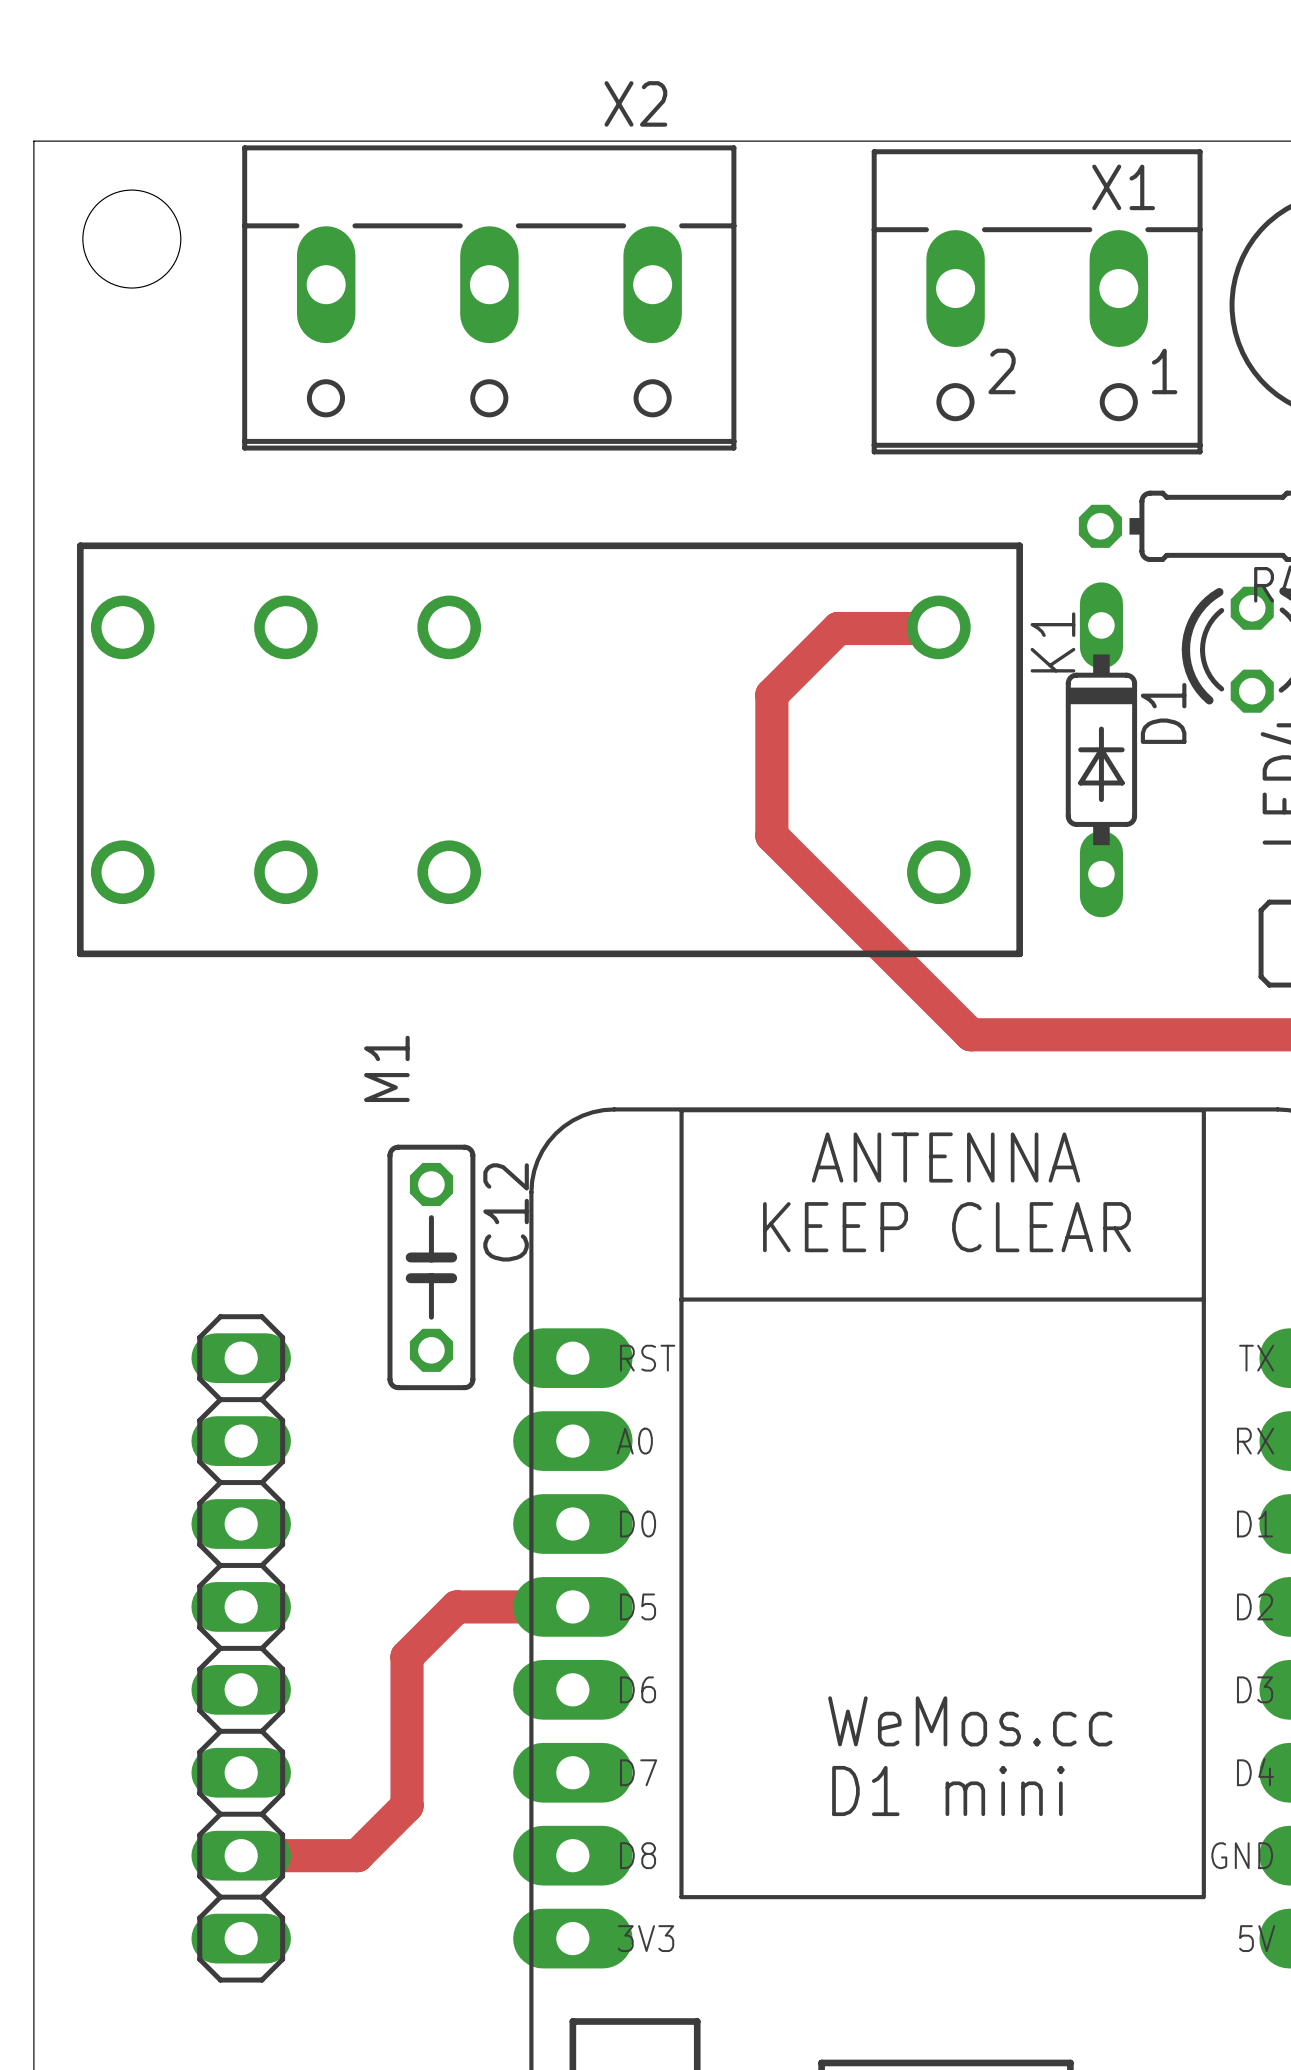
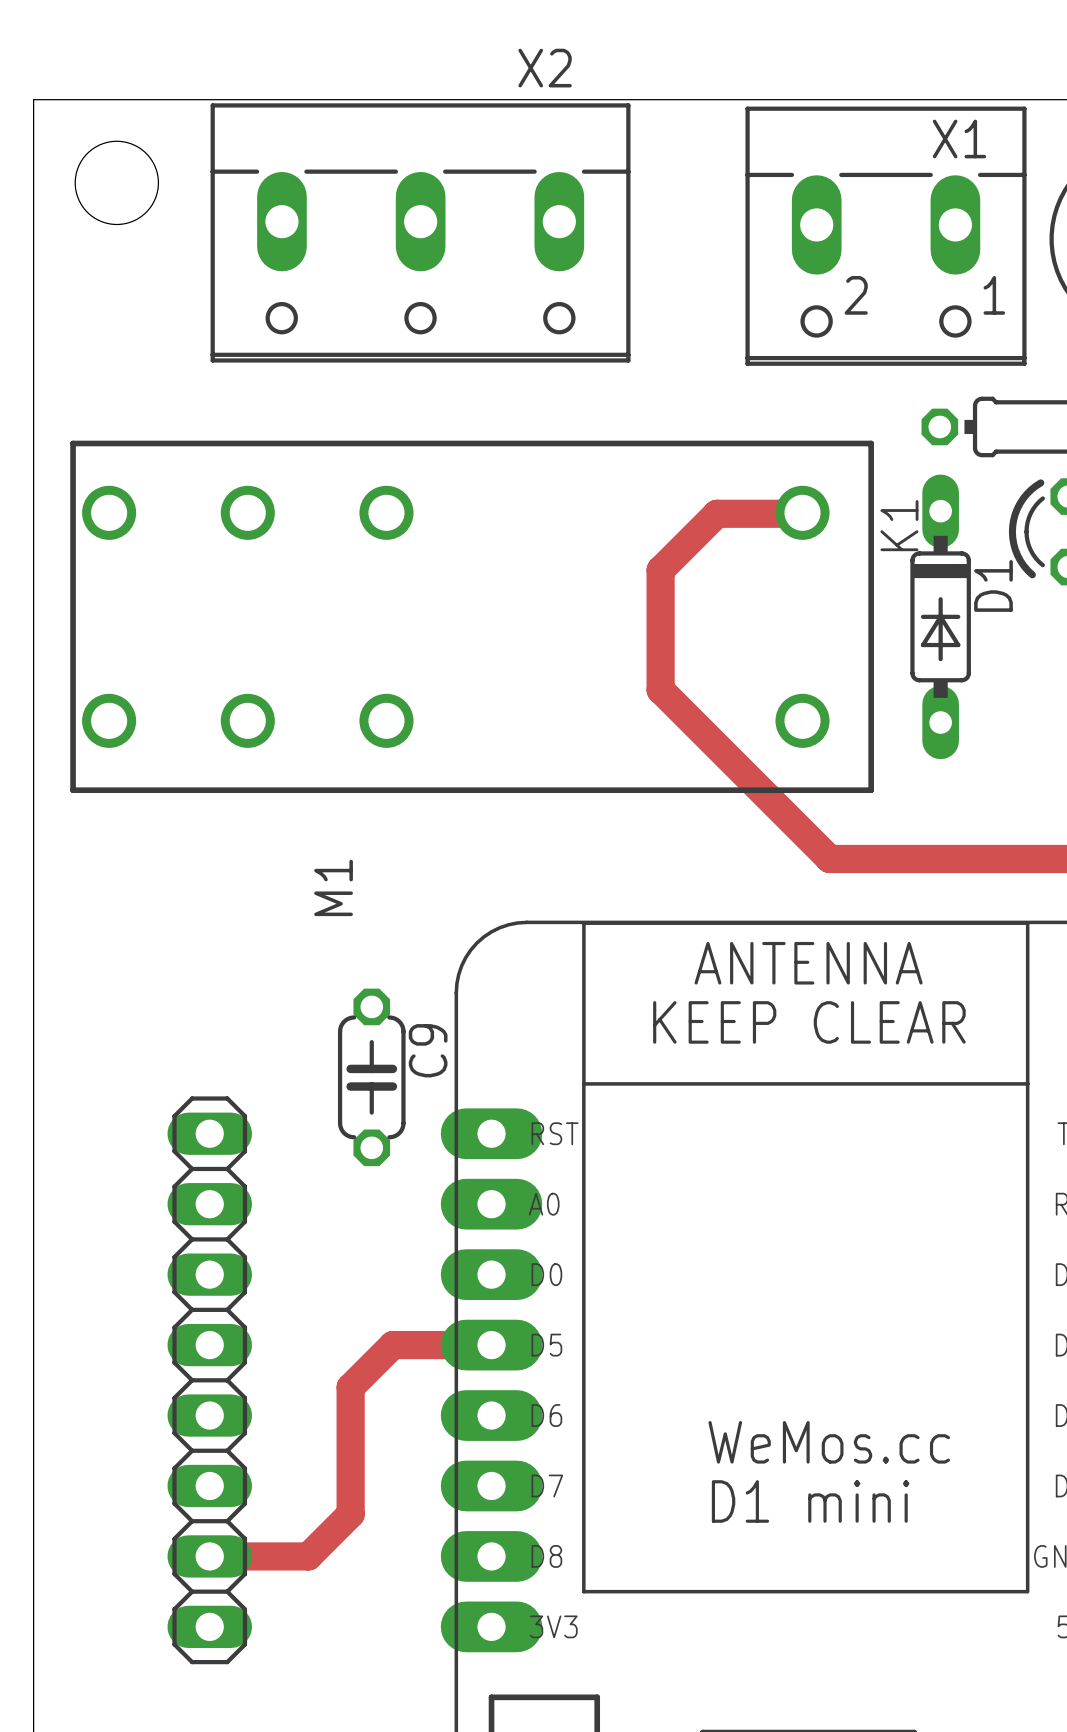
C12: (431, 1267) -> none
C9: none -> (371, 1077)

